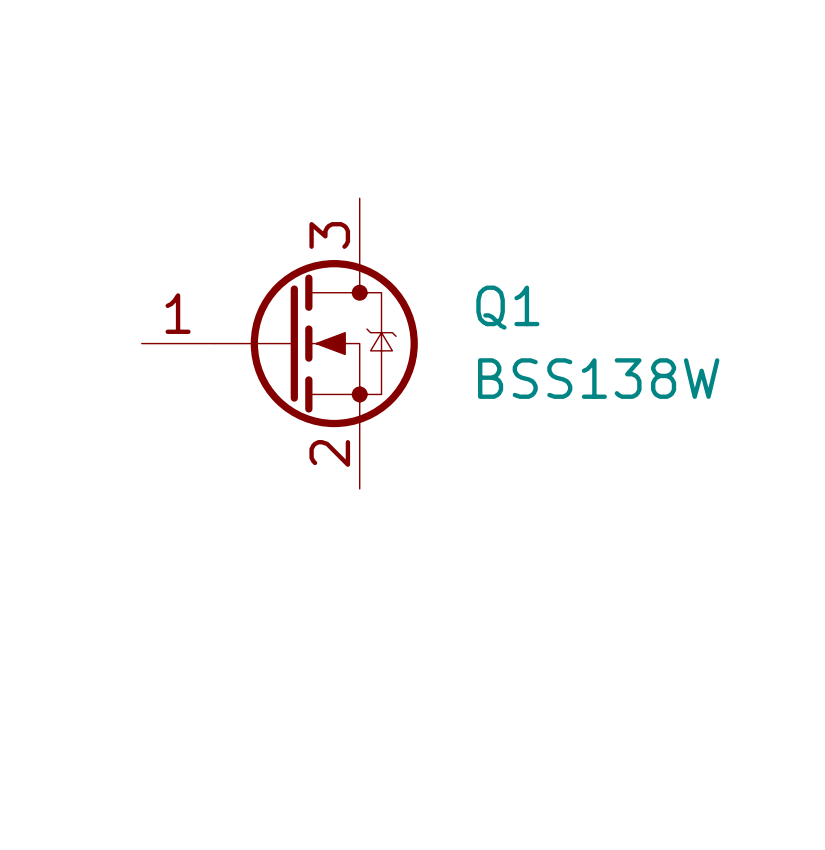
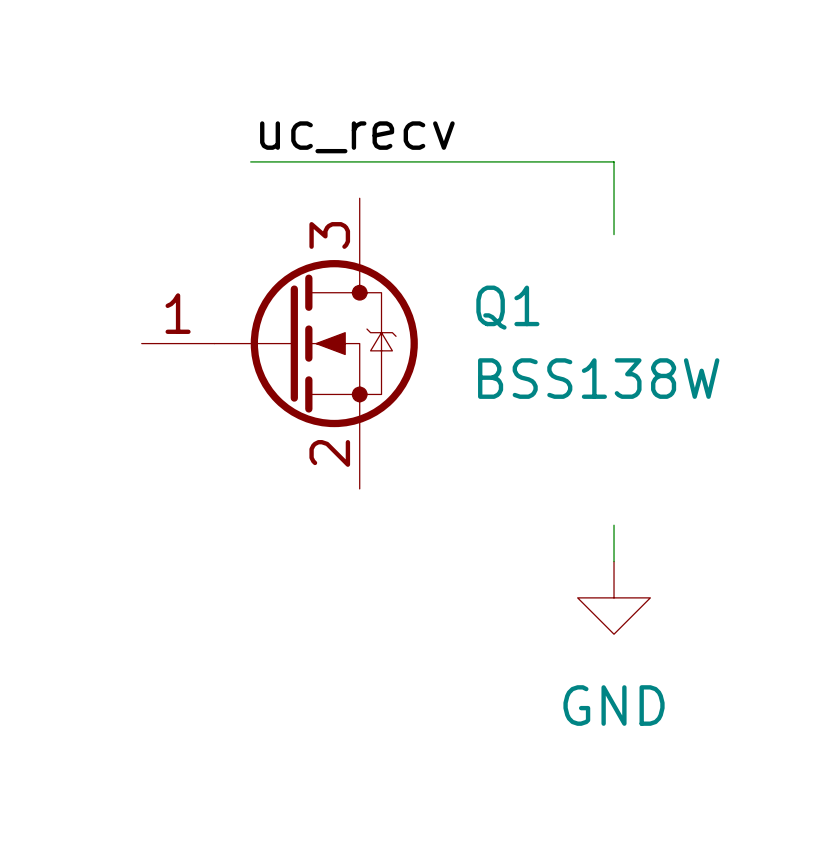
label: none -> uc_recv (357, 137)
wire: none -> (250, 161) (614, 161) (614, 234)
wire: none -> (614, 525) (614, 561)
power symbol: none -> GND (614, 597)

